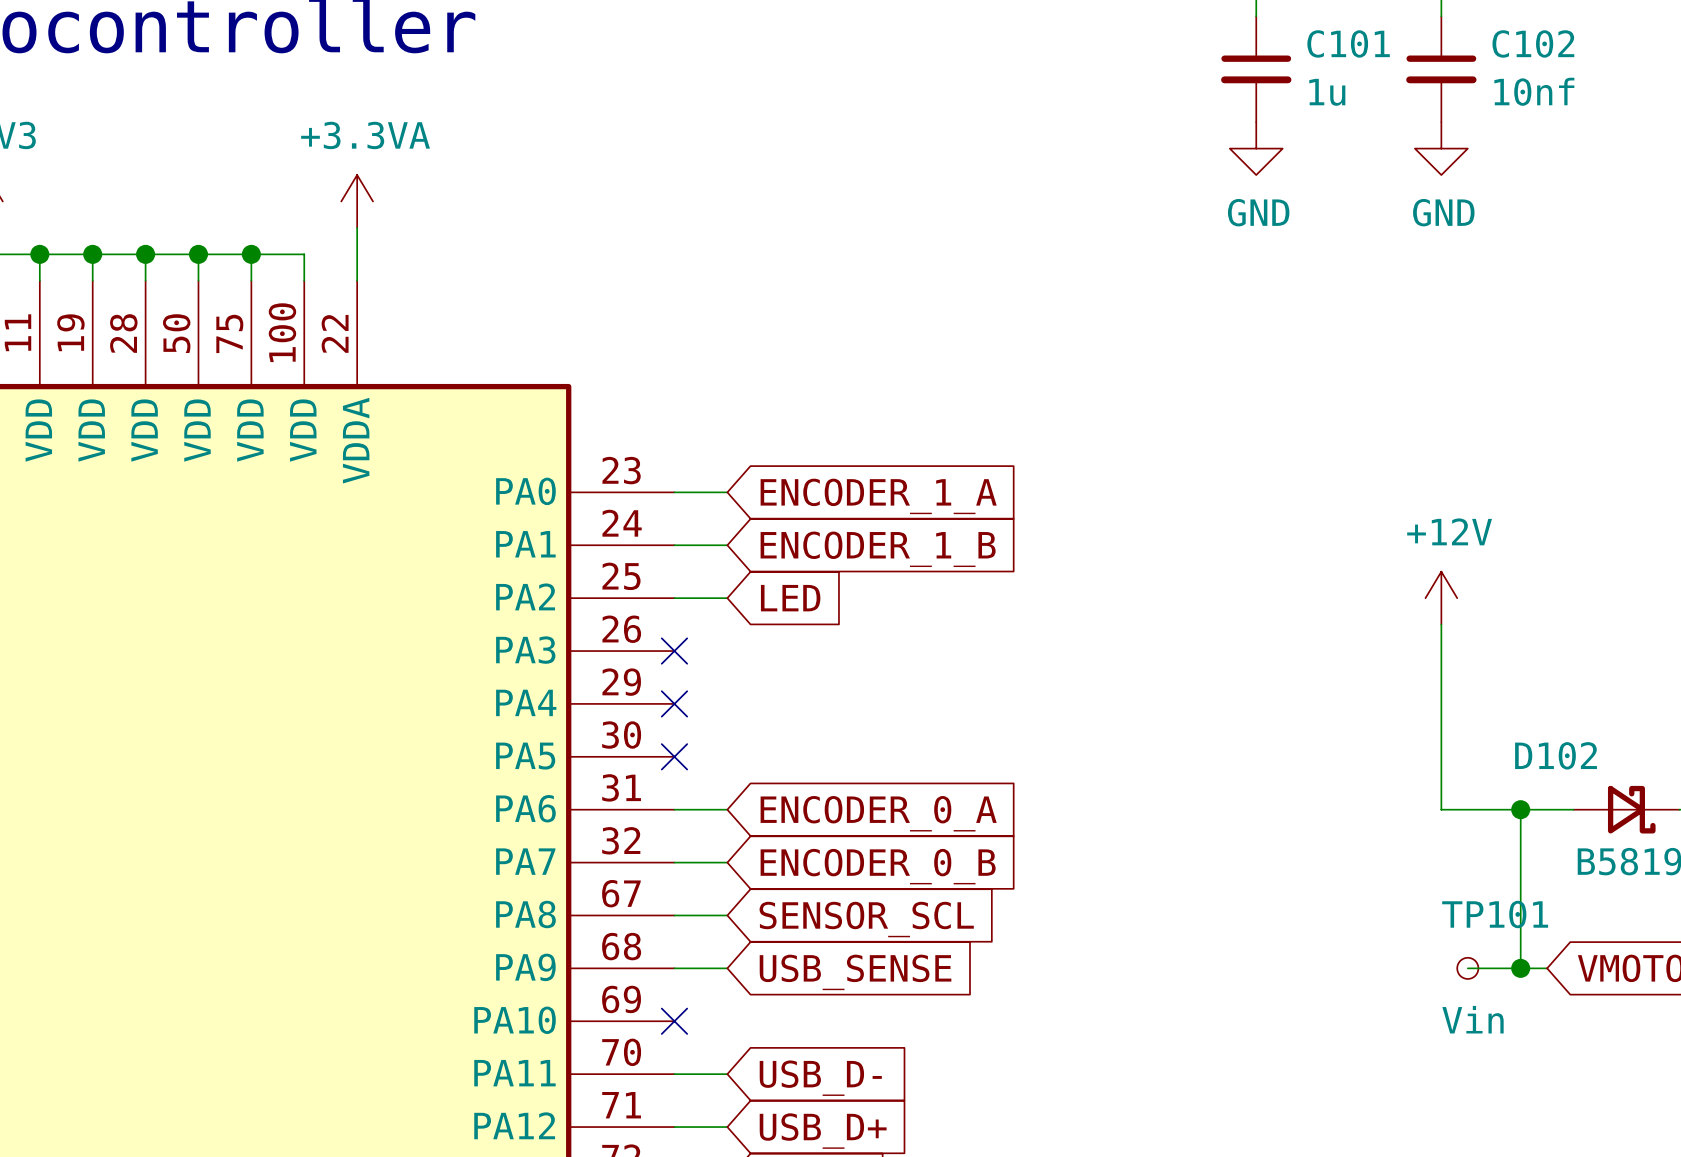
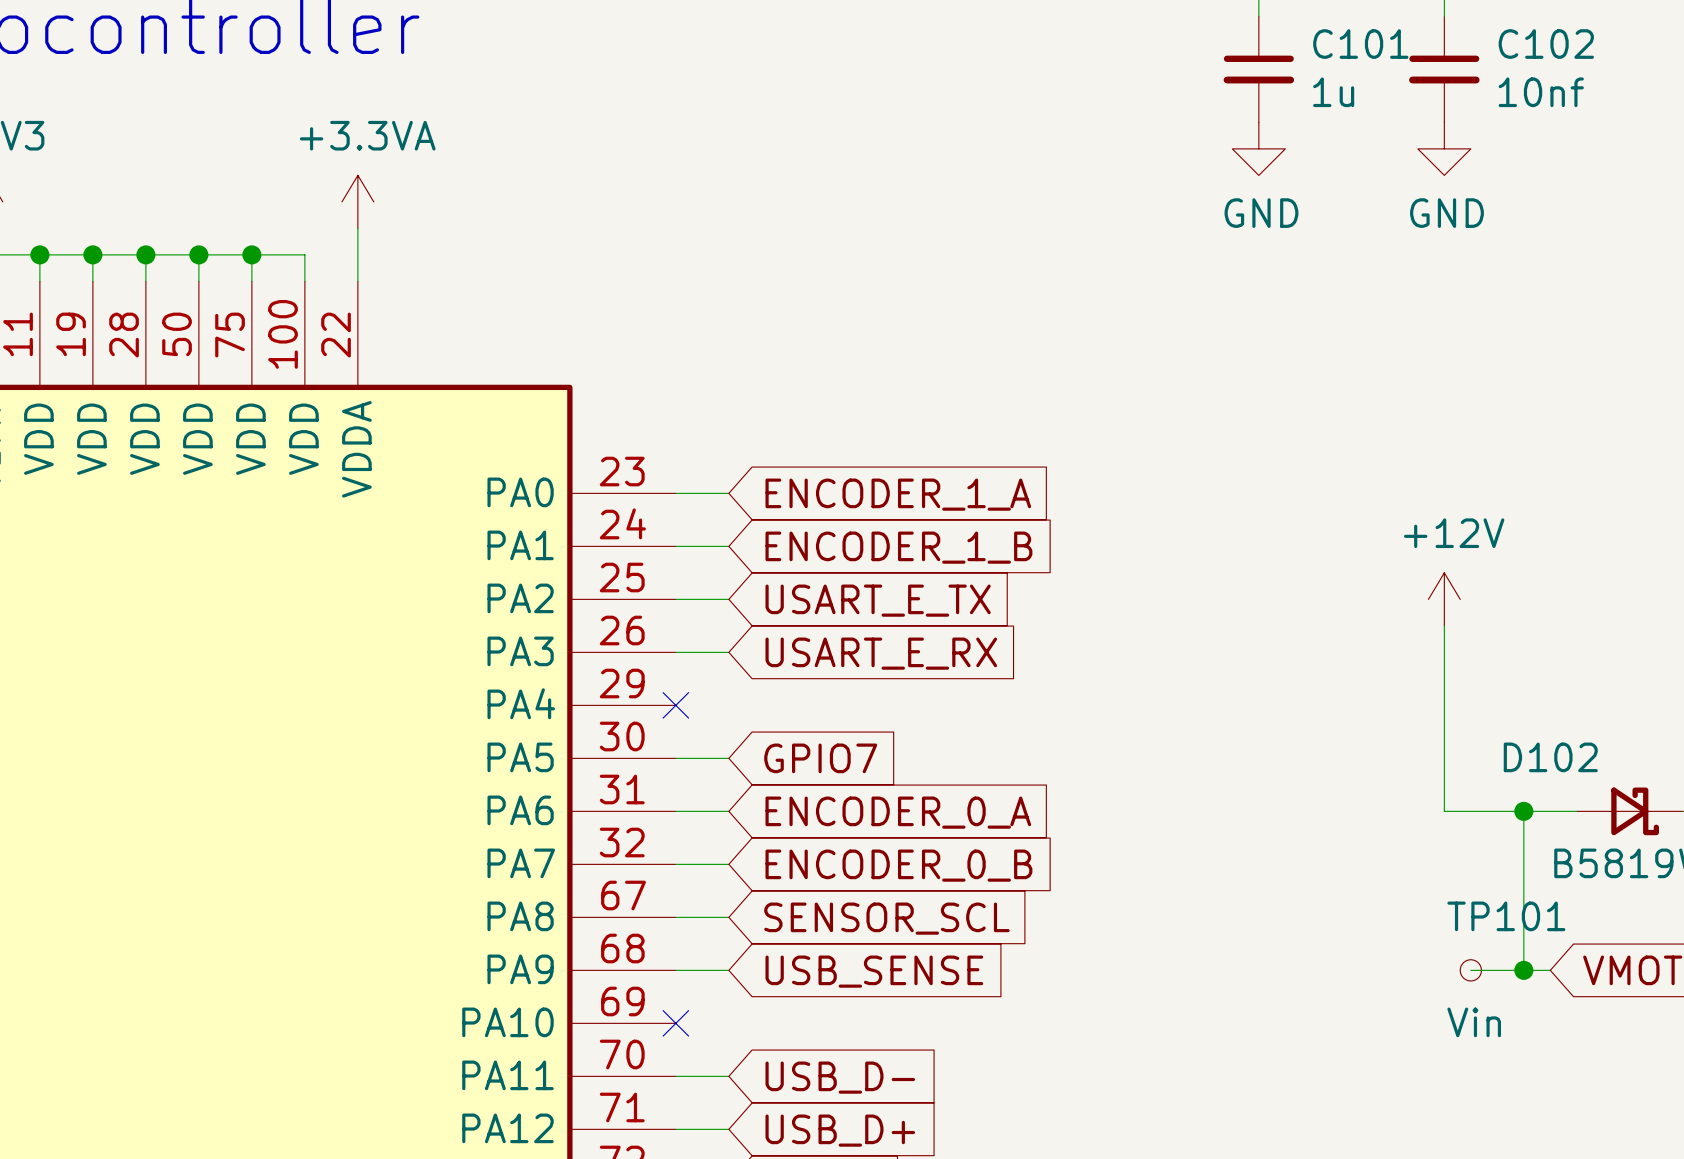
global label: LED (790, 598) -> USART_E_TX (878, 600)
wire: none -> (675, 652) (728, 652)
no-connect mark: (674, 651) -> none
global label: none -> USART_E_RX (881, 653)
wire: none -> (675, 758) (728, 758)
no-connect mark: (674, 756) -> none
global label: none -> GPIO7 (820, 758)

